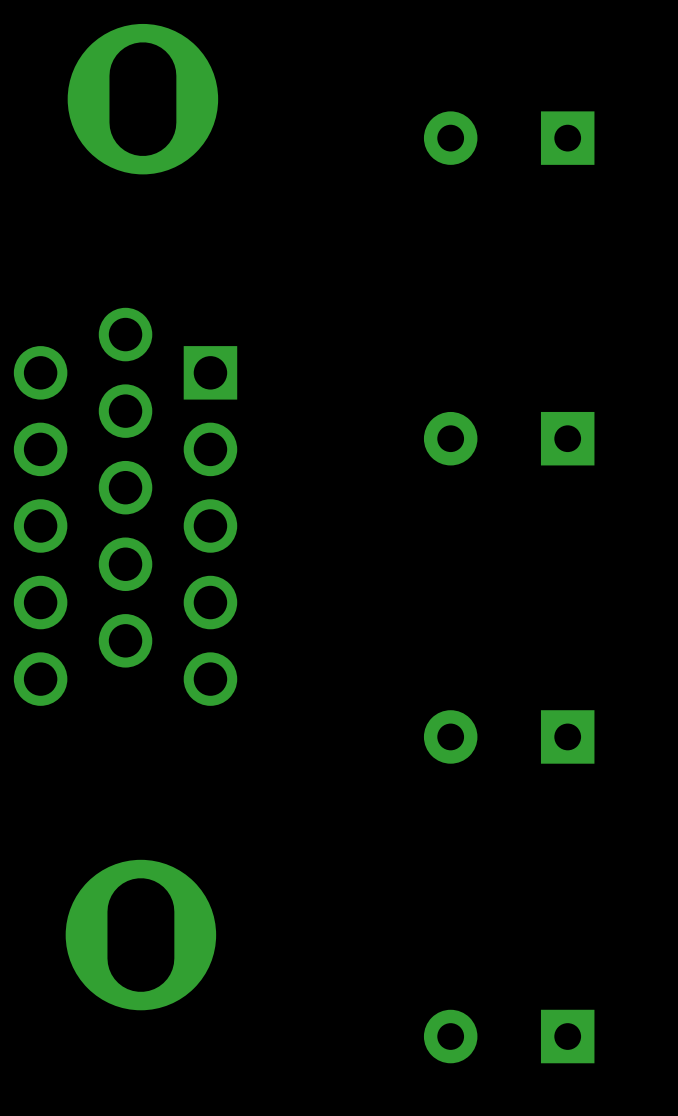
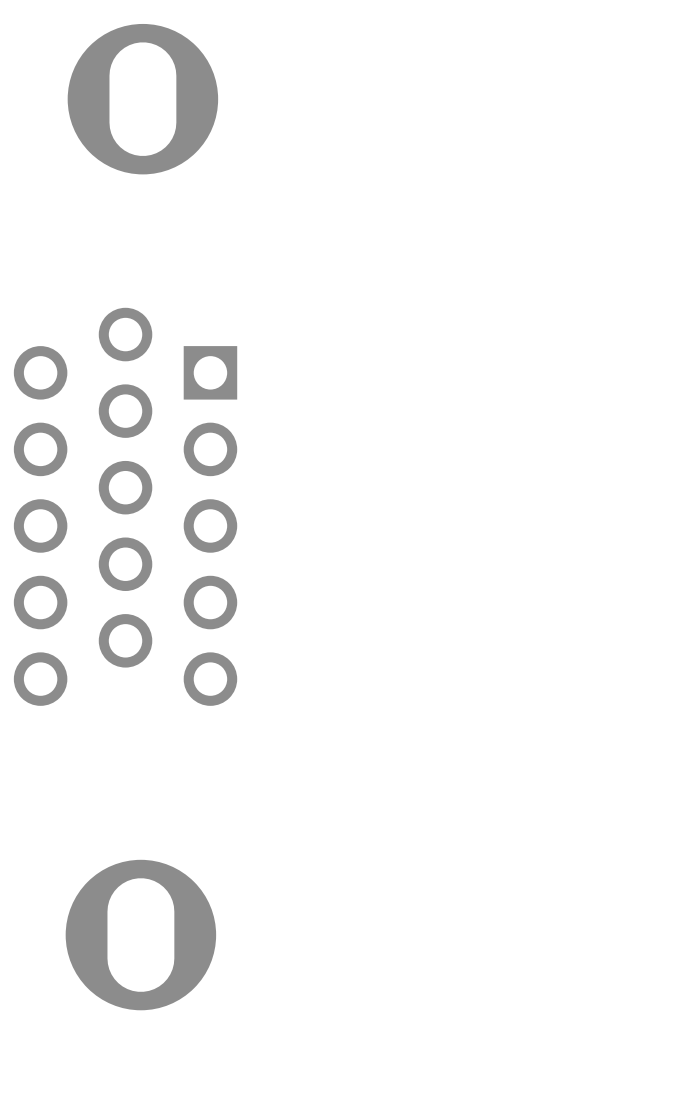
part: (509, 138) -> none
part: (509, 438) -> none
part: (509, 736) -> none
part: (509, 1036) -> none

